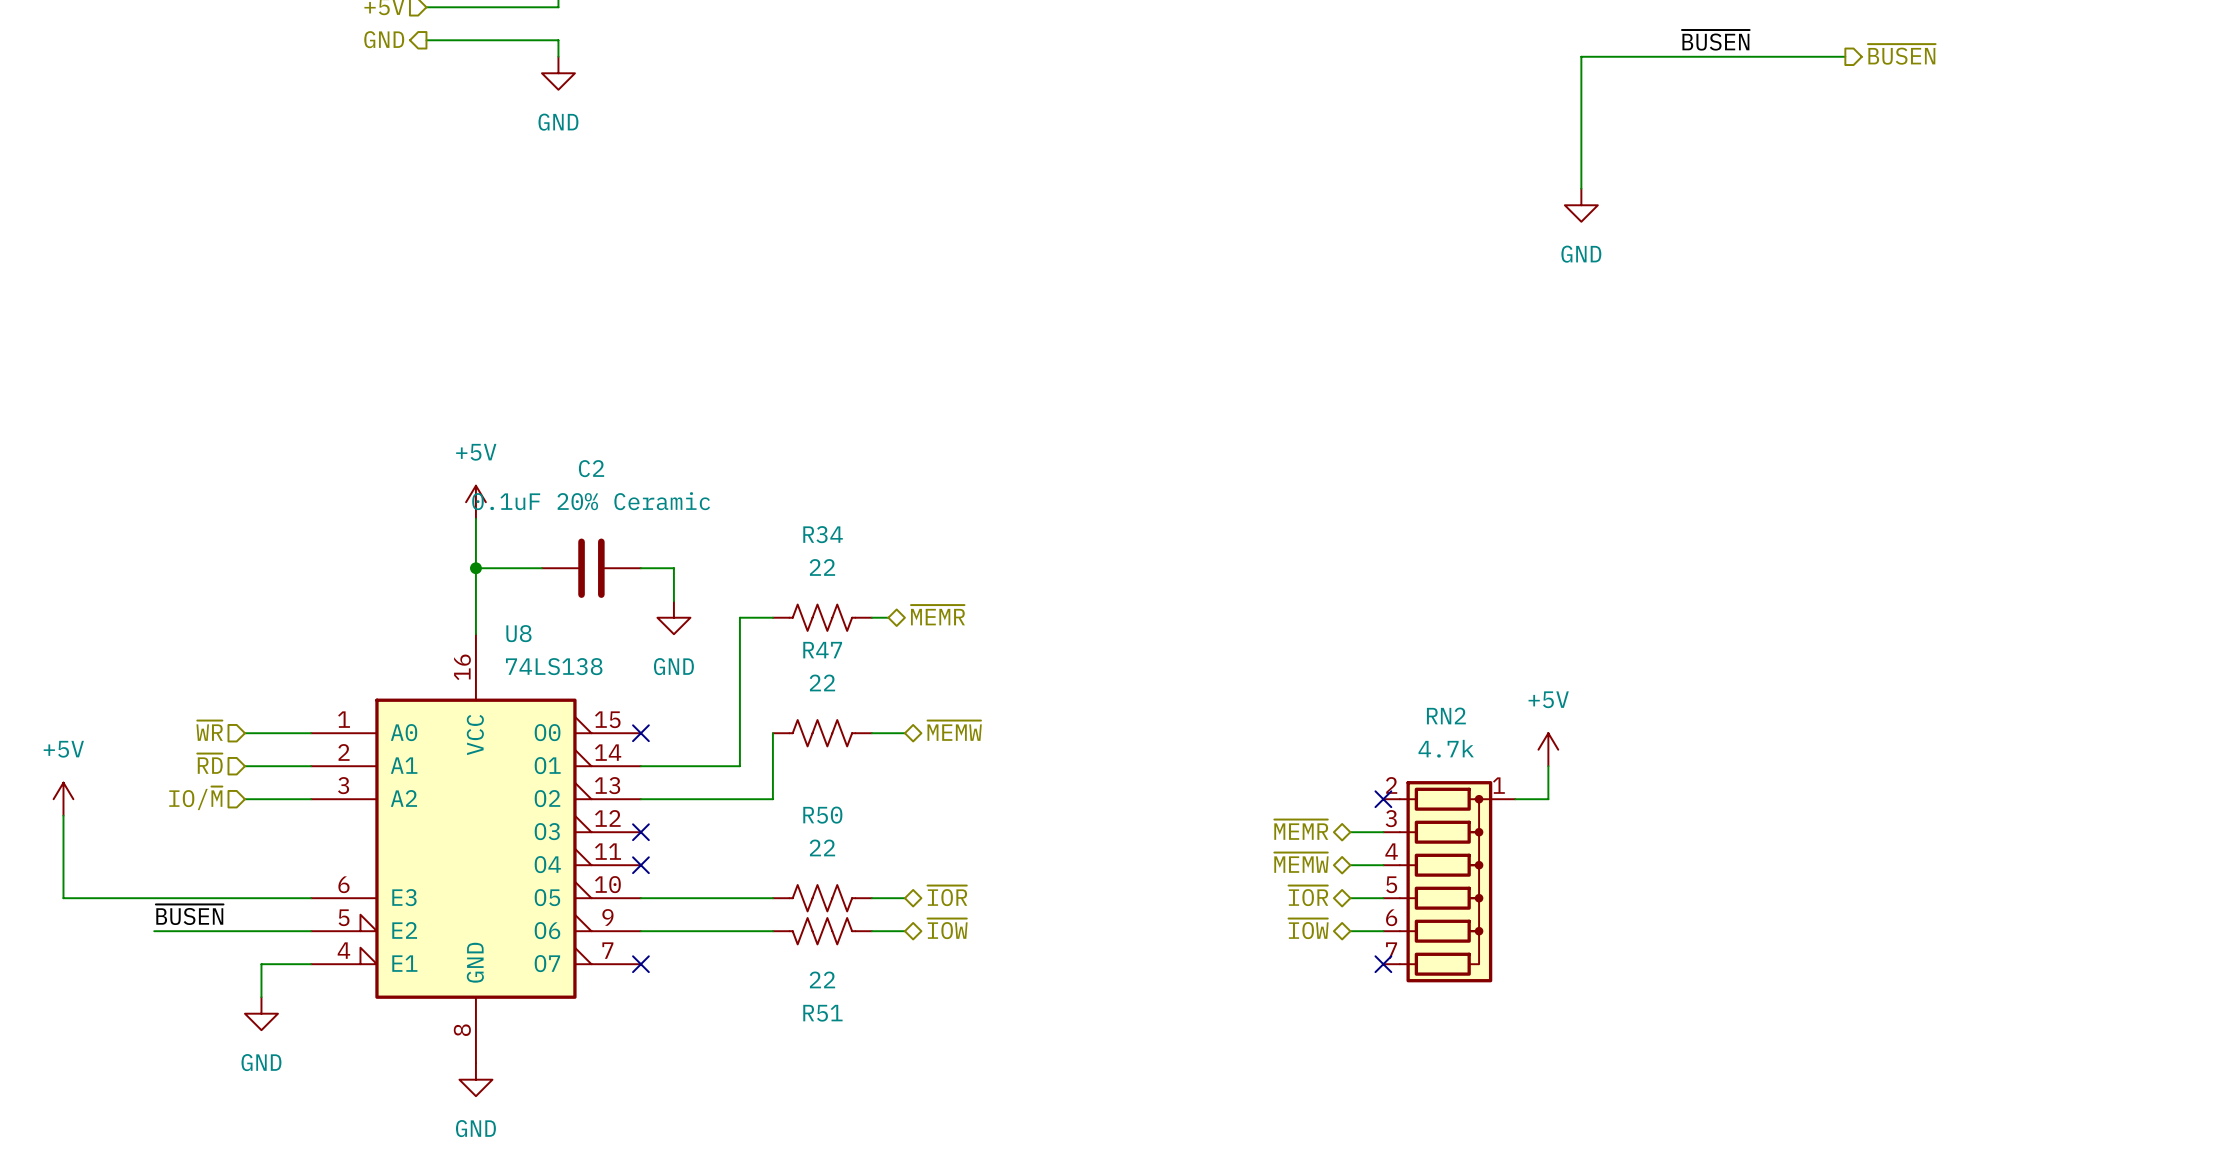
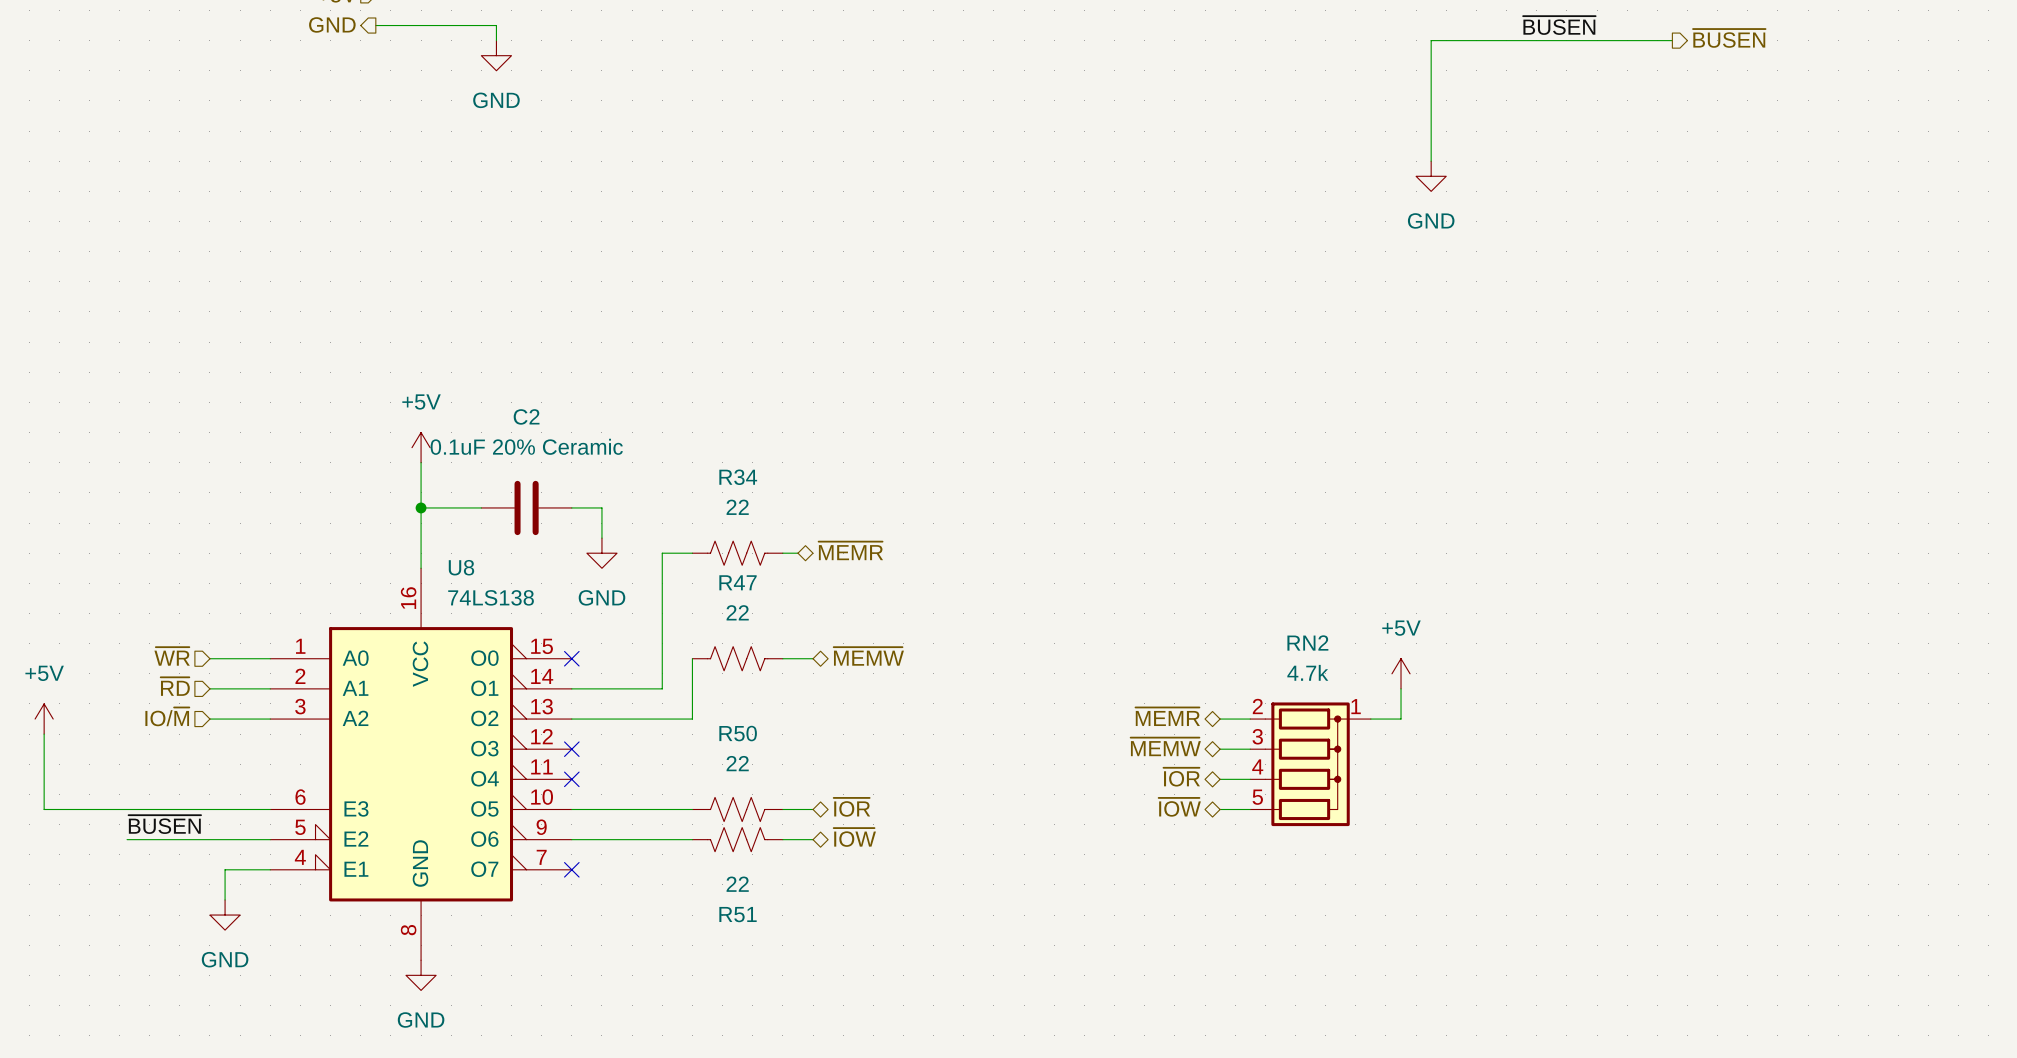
RN2 symbol: [1383, 781, 1516, 983] -> [1250, 702, 1371, 827]
hierarchical label: none -> ~{MEMR} (1167, 716)
no-connect mark: (1383, 799) -> none
hierarchical label: ~{MEMR} (1301, 829) -> ~{MEMW} (1165, 746)
hierarchical label: ~{MEMW} (1301, 862) -> ~{IOR} (1181, 777)
hierarchical label: ~{IOR} (1308, 895) -> ~{IOW} (1179, 807)
hierarchical label: ~{IOW} (1308, 928) -> none
wire: (1350, 931) (1383, 931) -> (1220, 719) (1250, 719)
no-connect mark: (1383, 964) -> none

